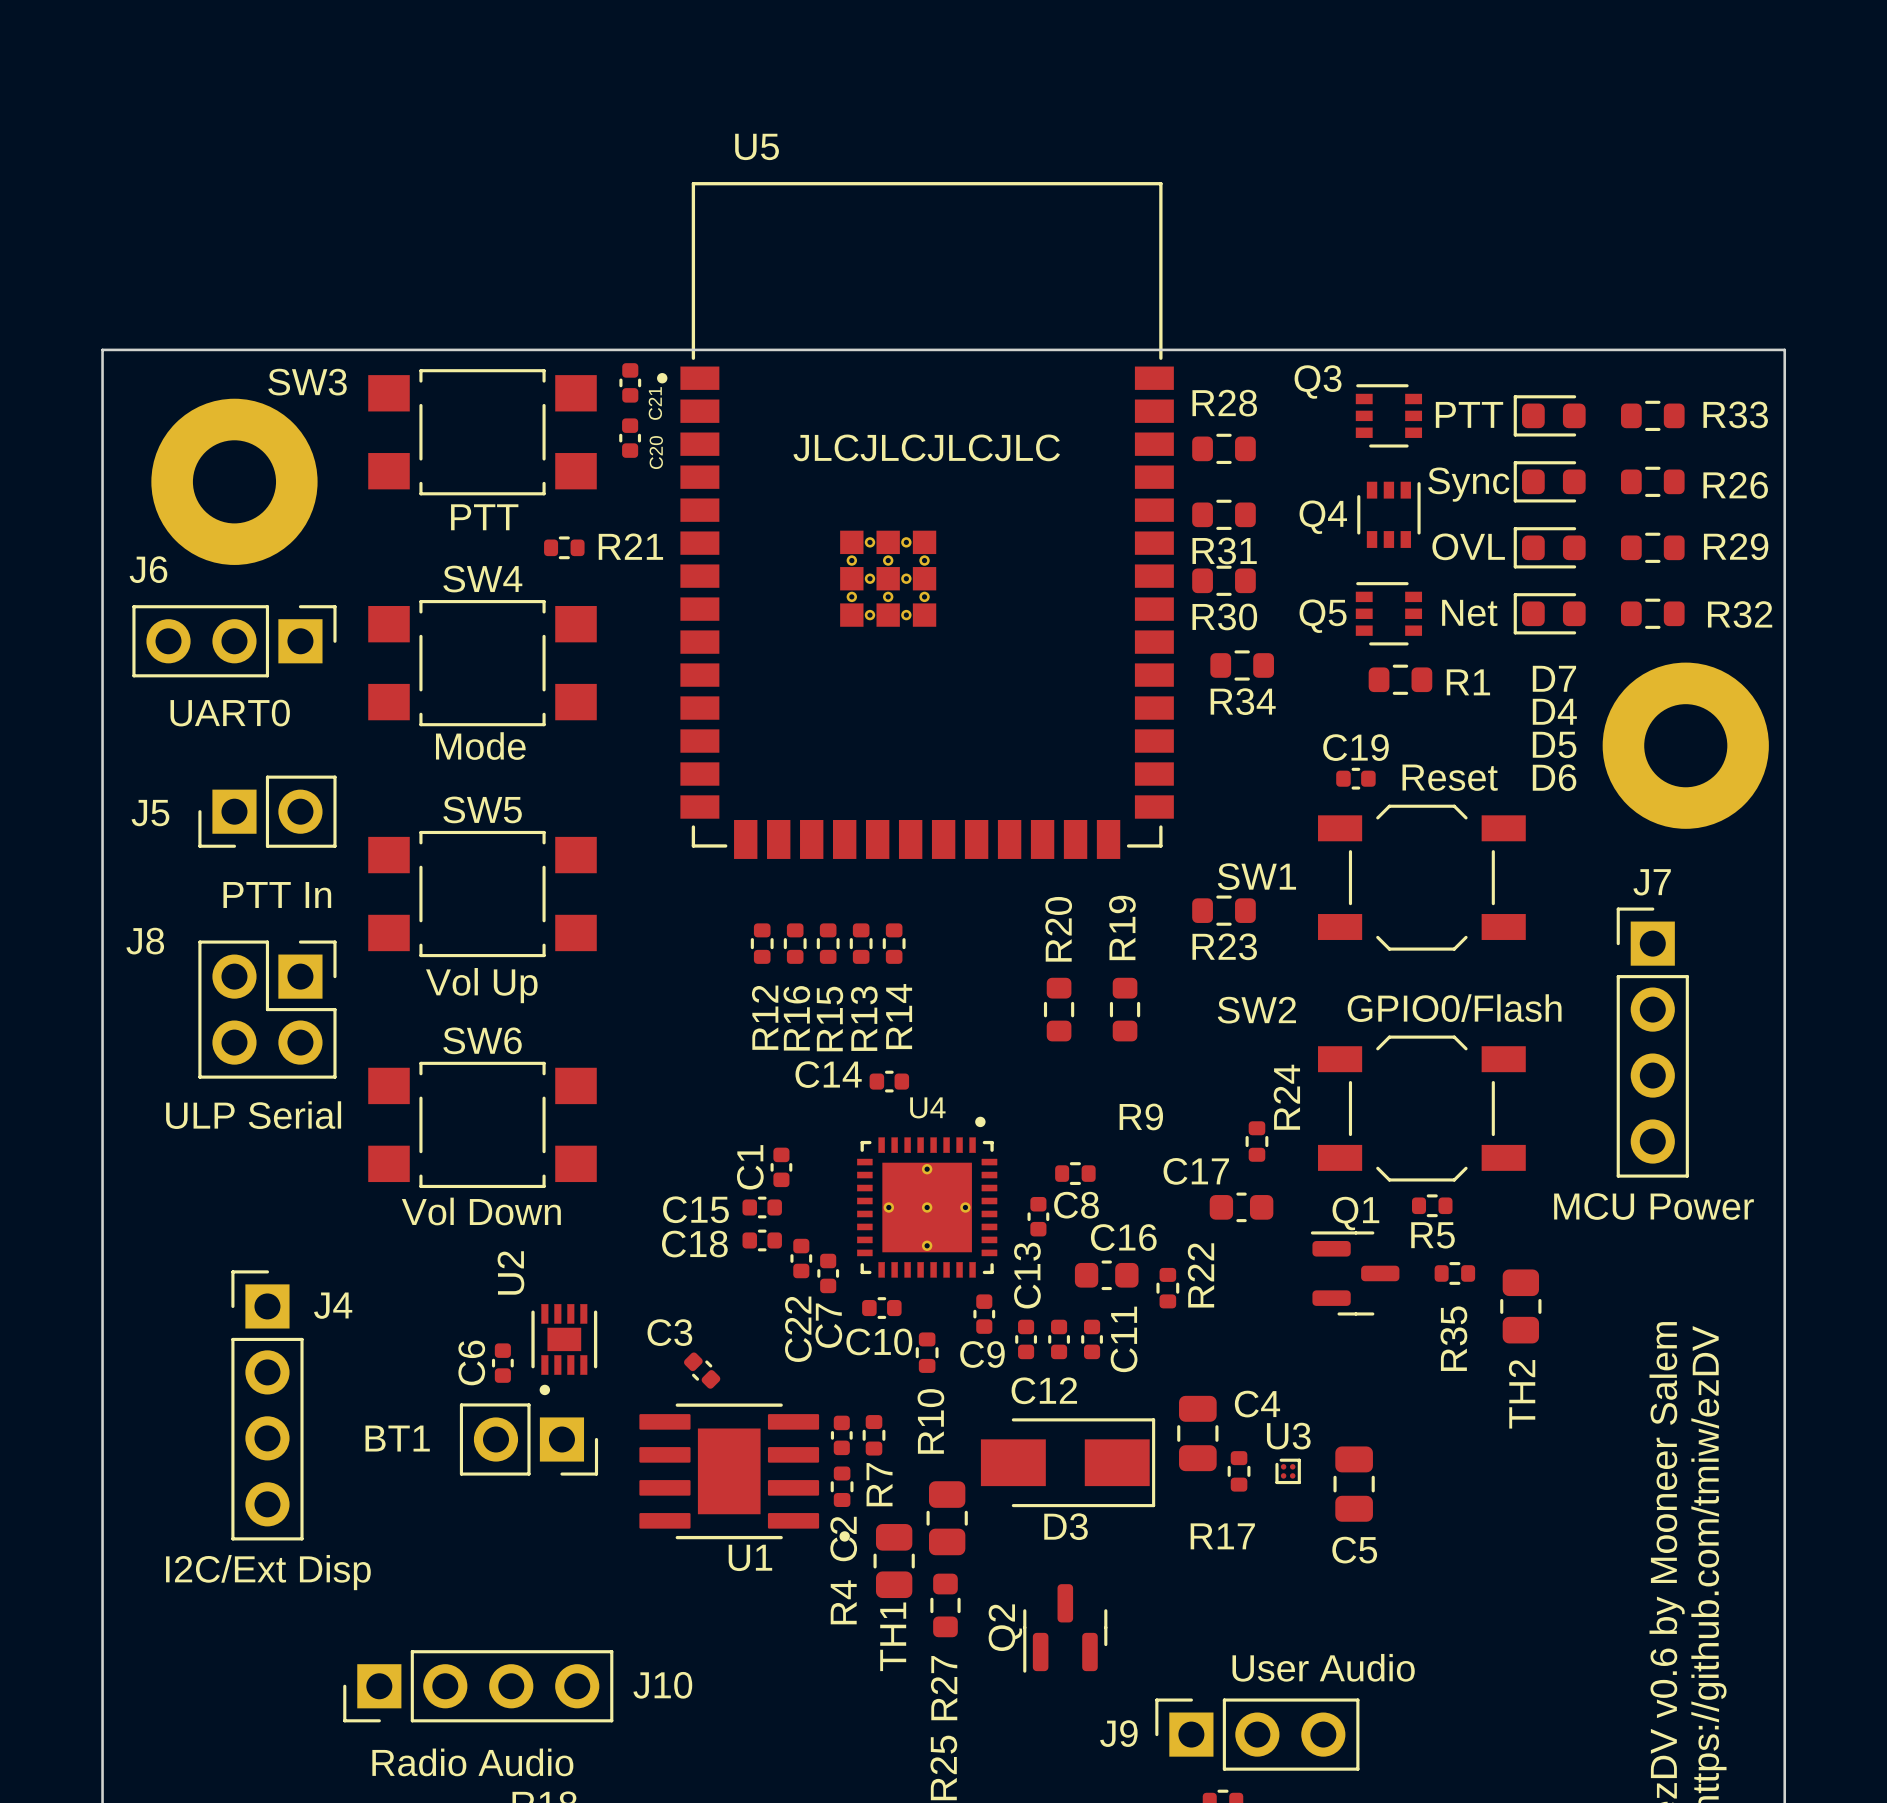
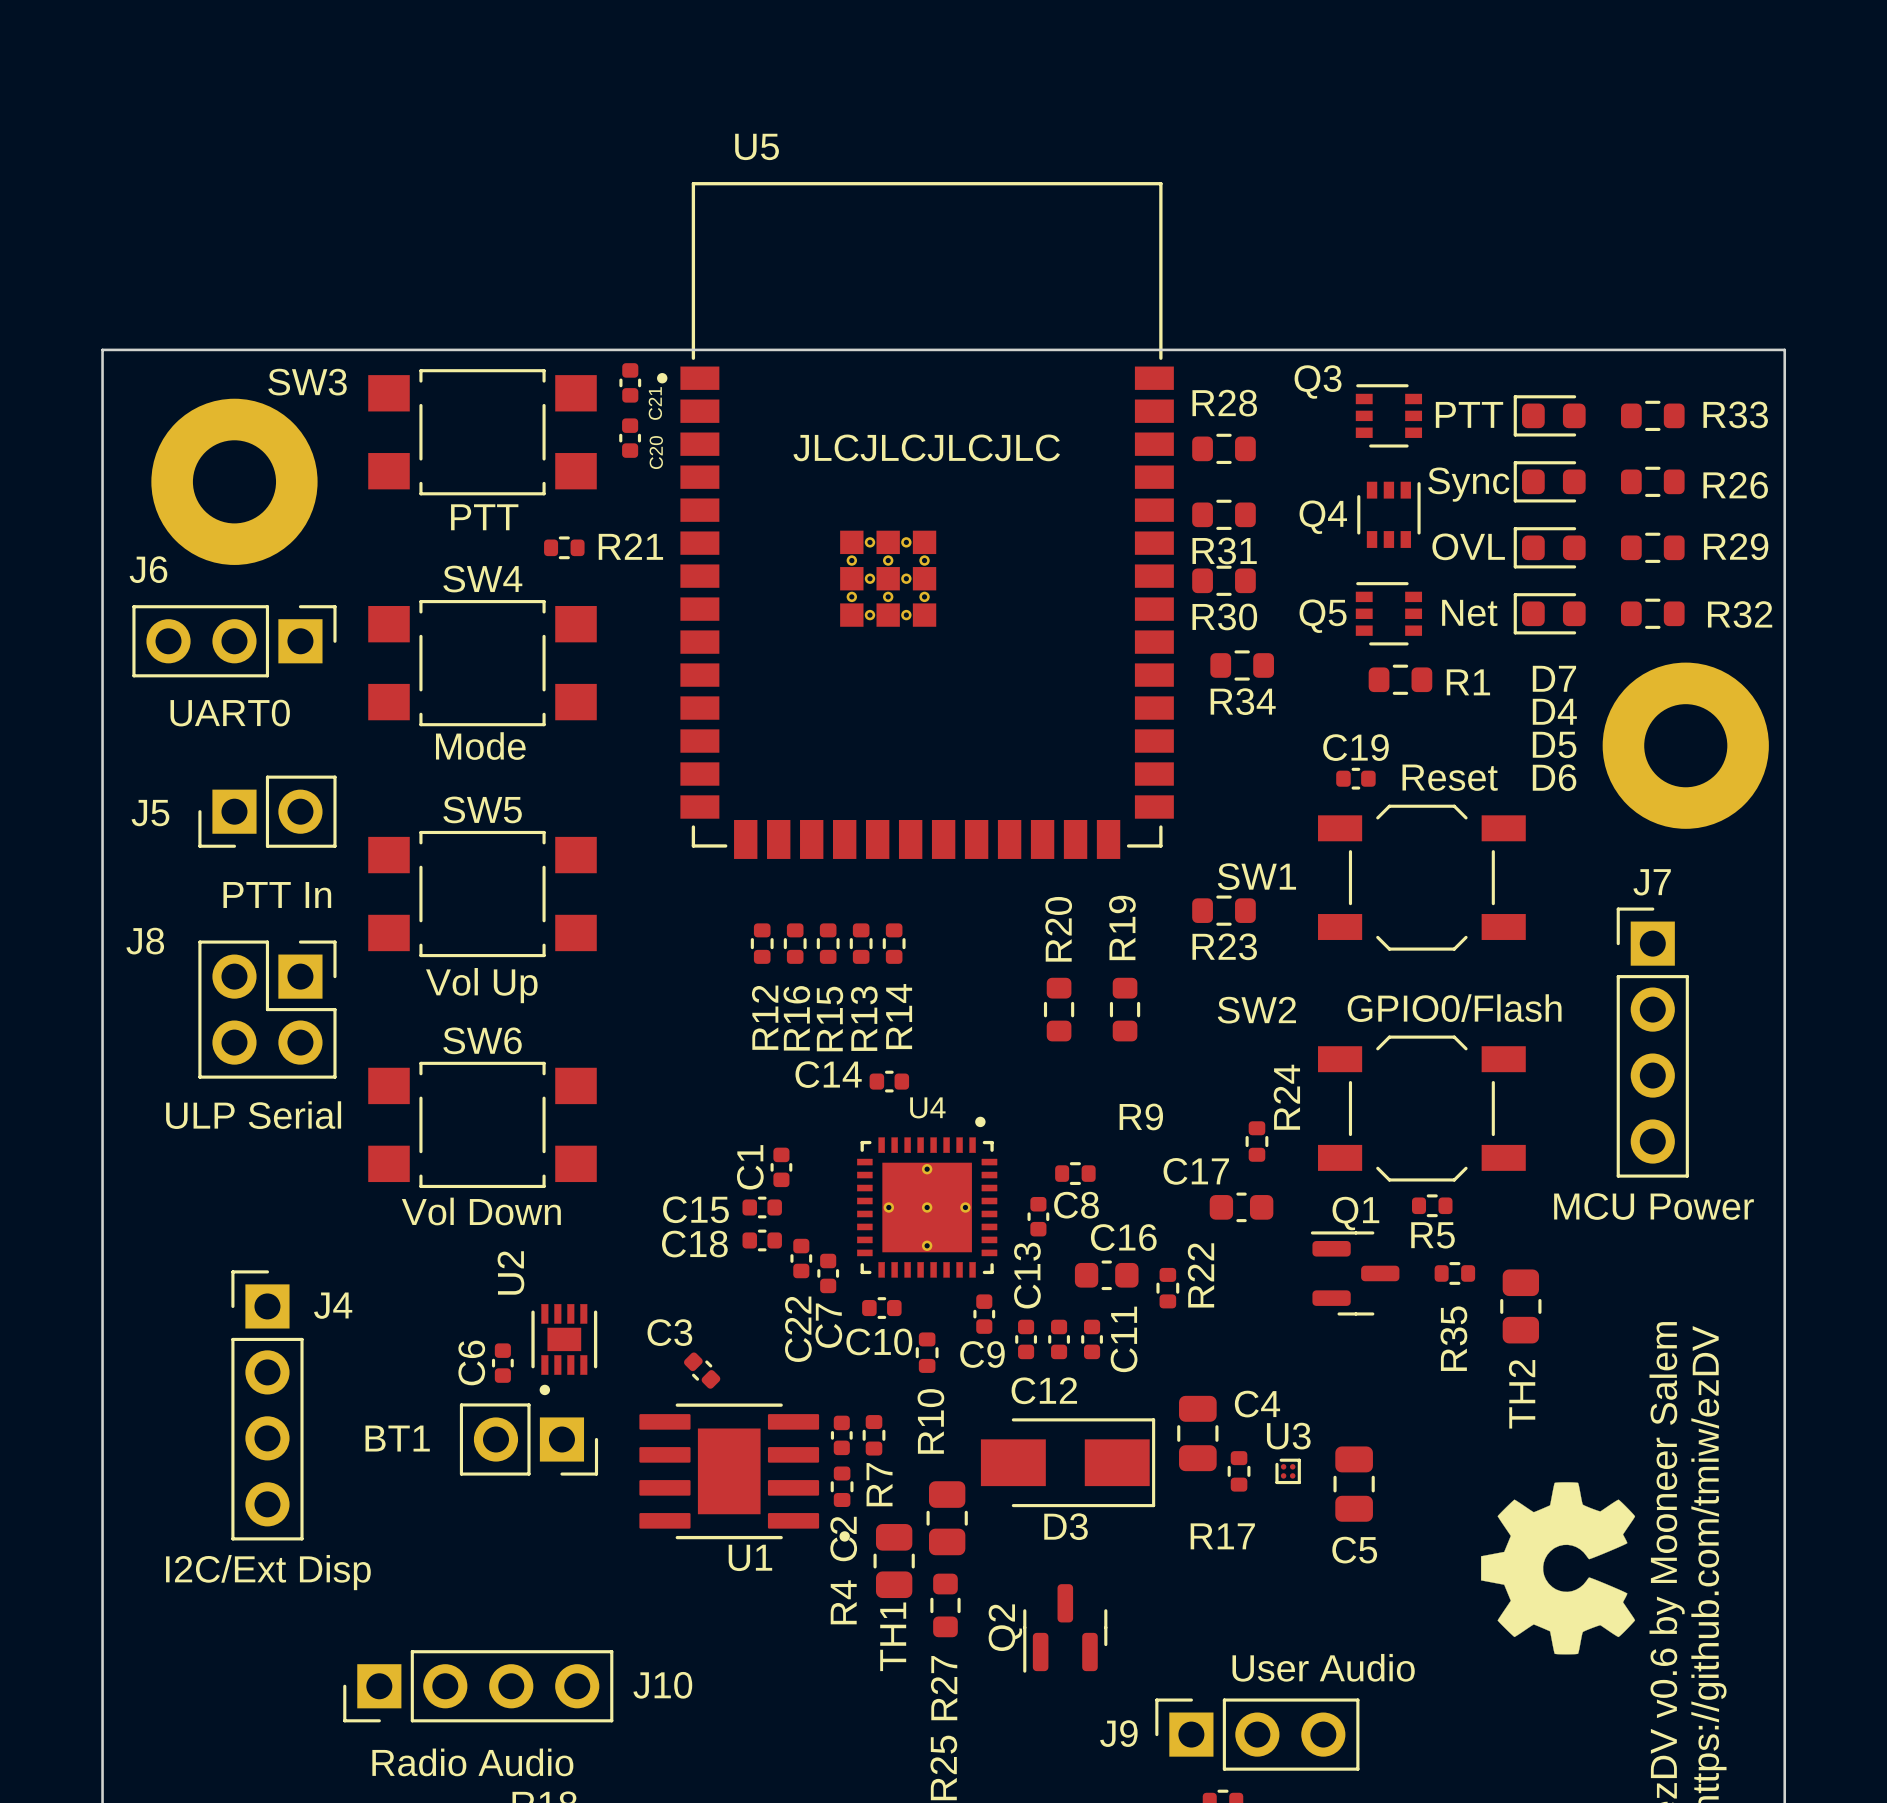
drawing: none -> [1481, 1482, 1636, 1655]

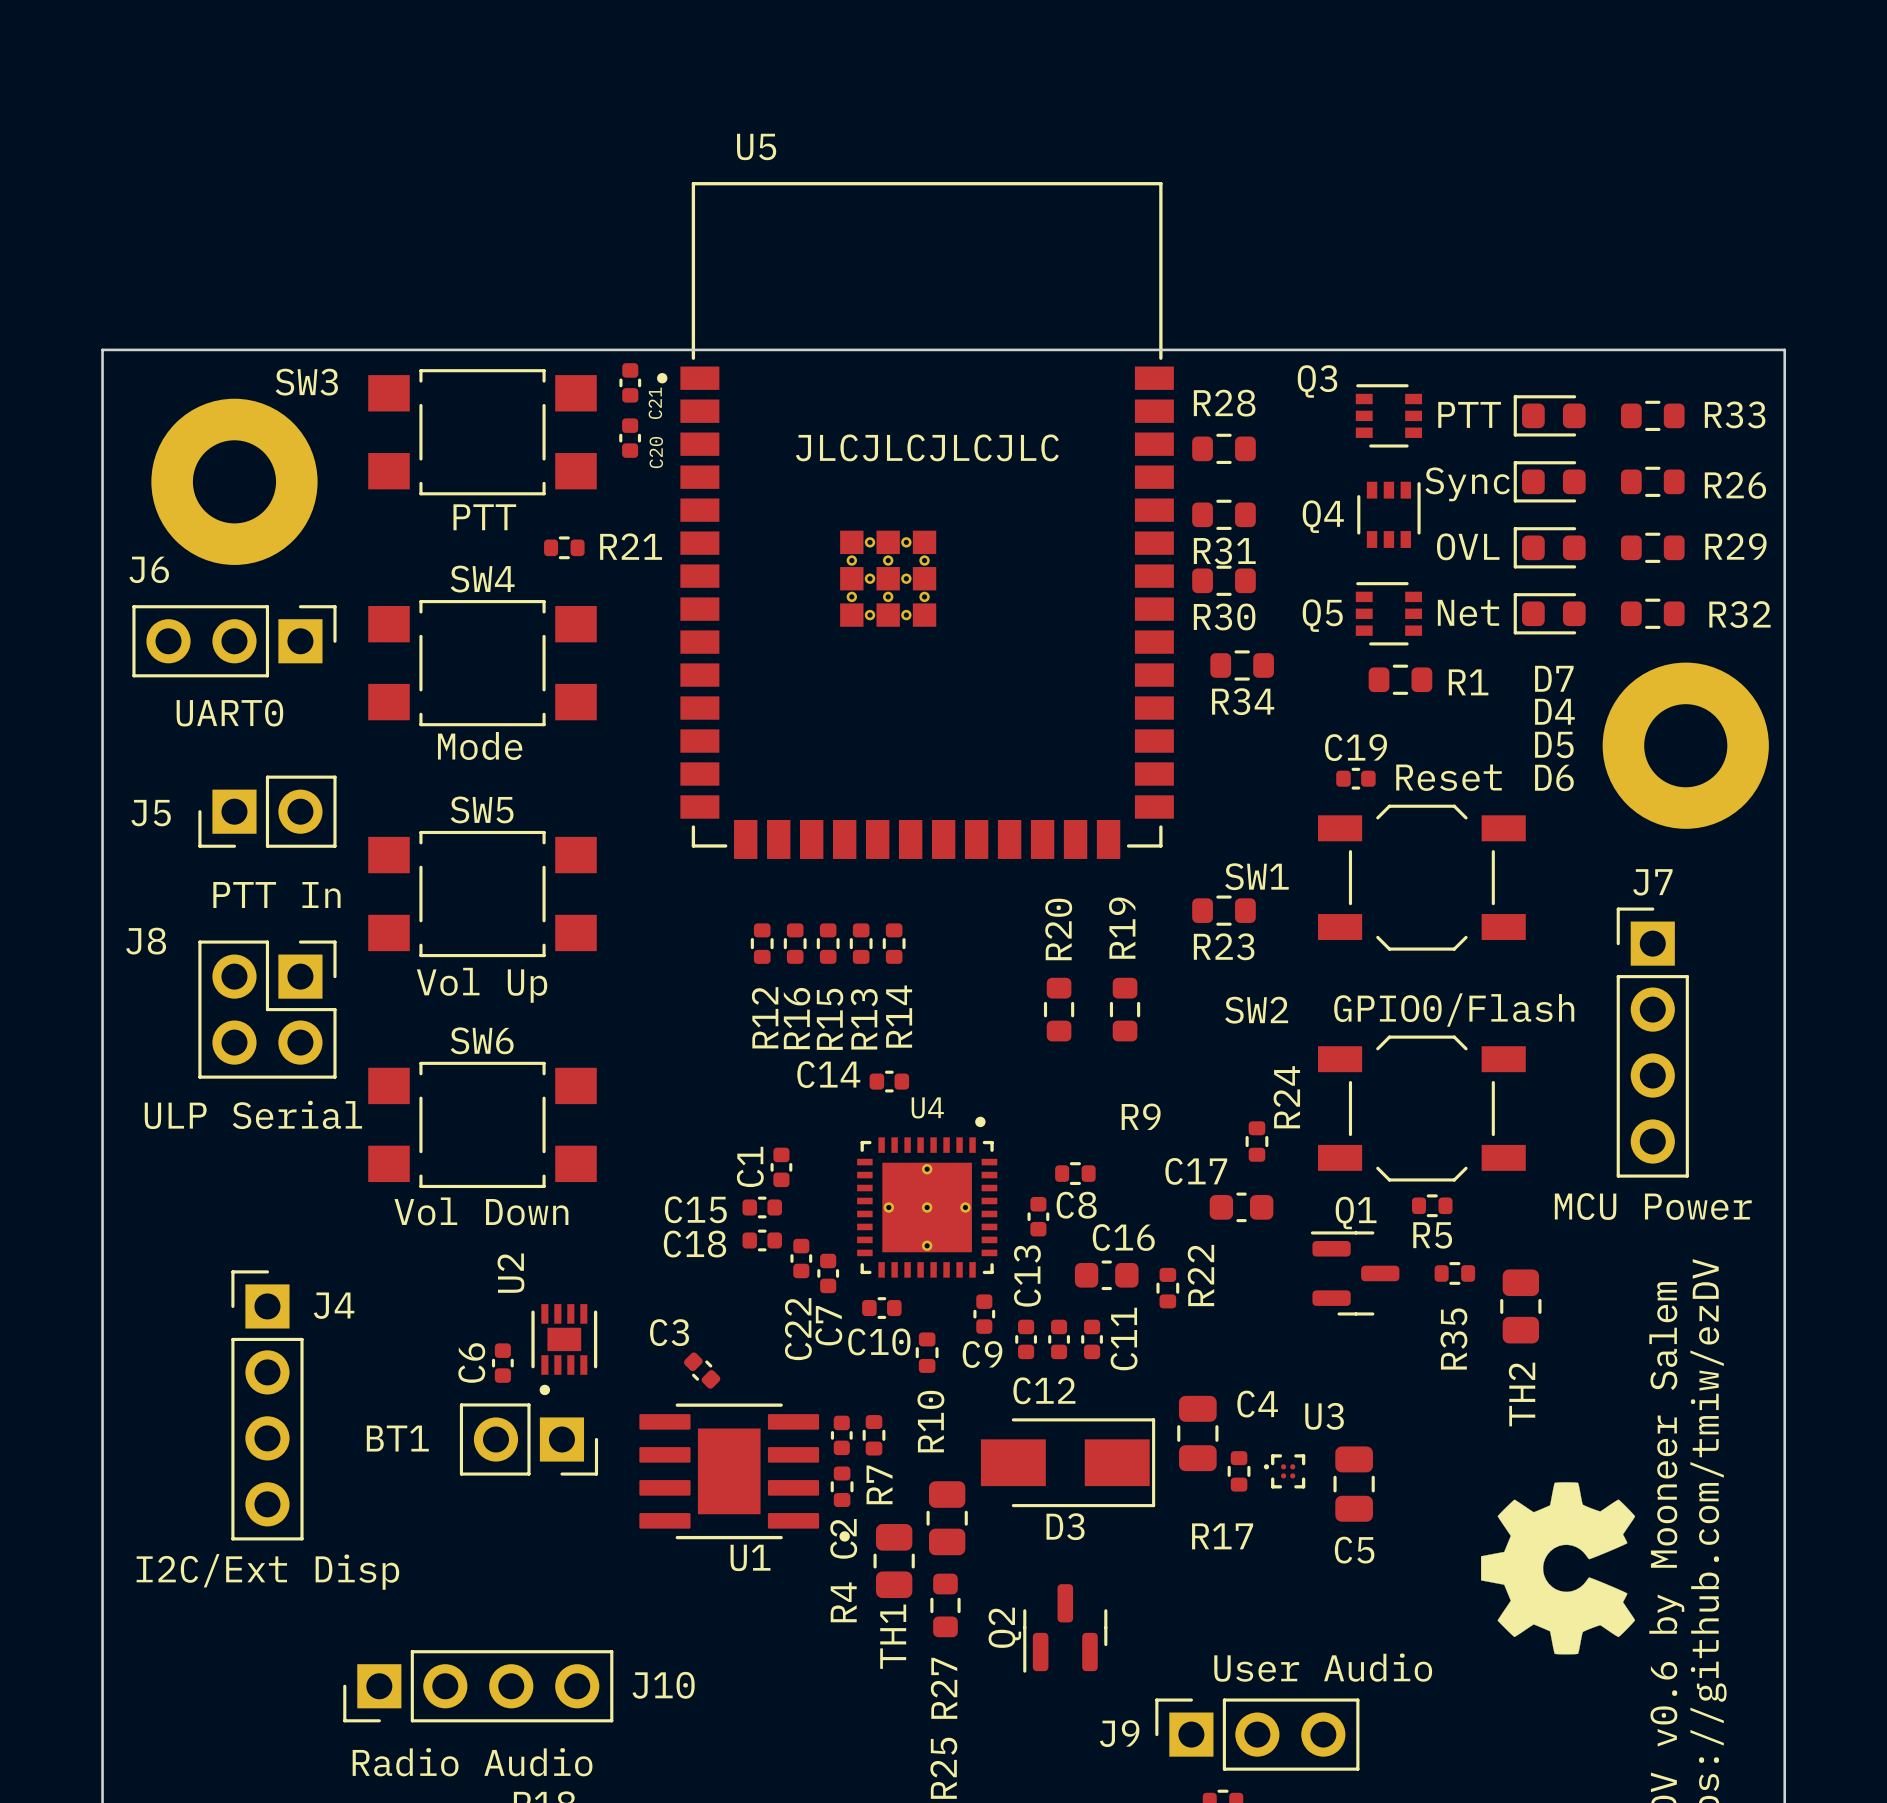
U3 name position: U3 (1288, 1436) -> U3 (1324, 1416)
U3 footprint: [1275, 1458, 1301, 1485] -> [1263, 1454, 1306, 1489]

